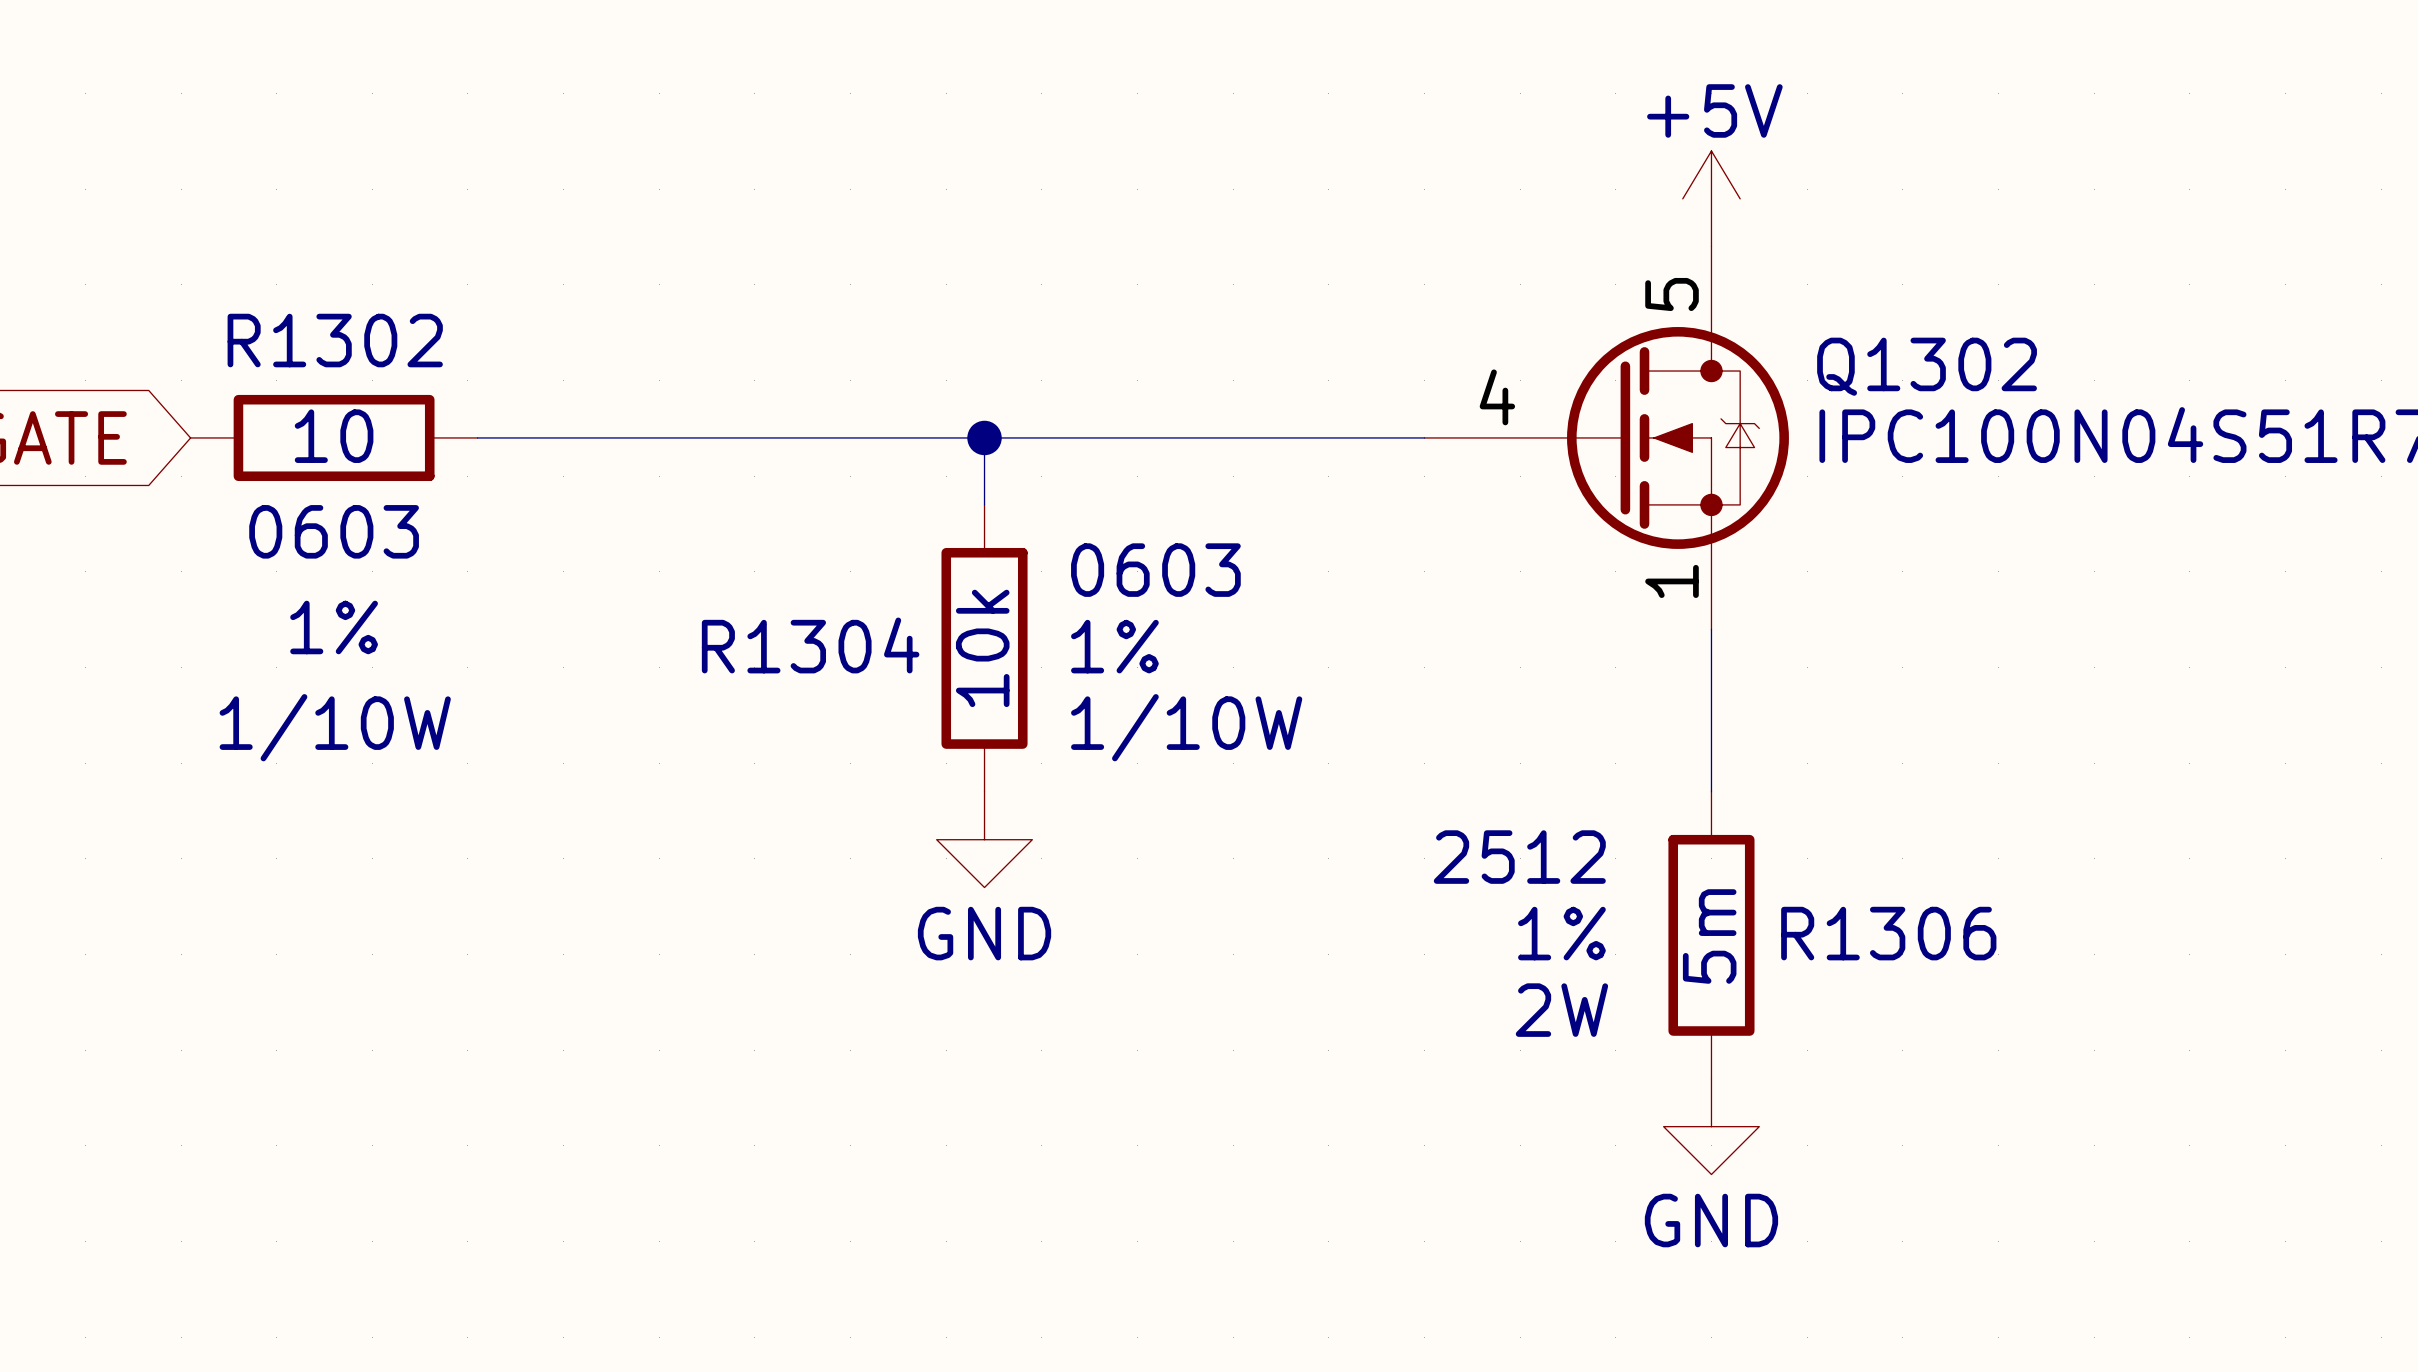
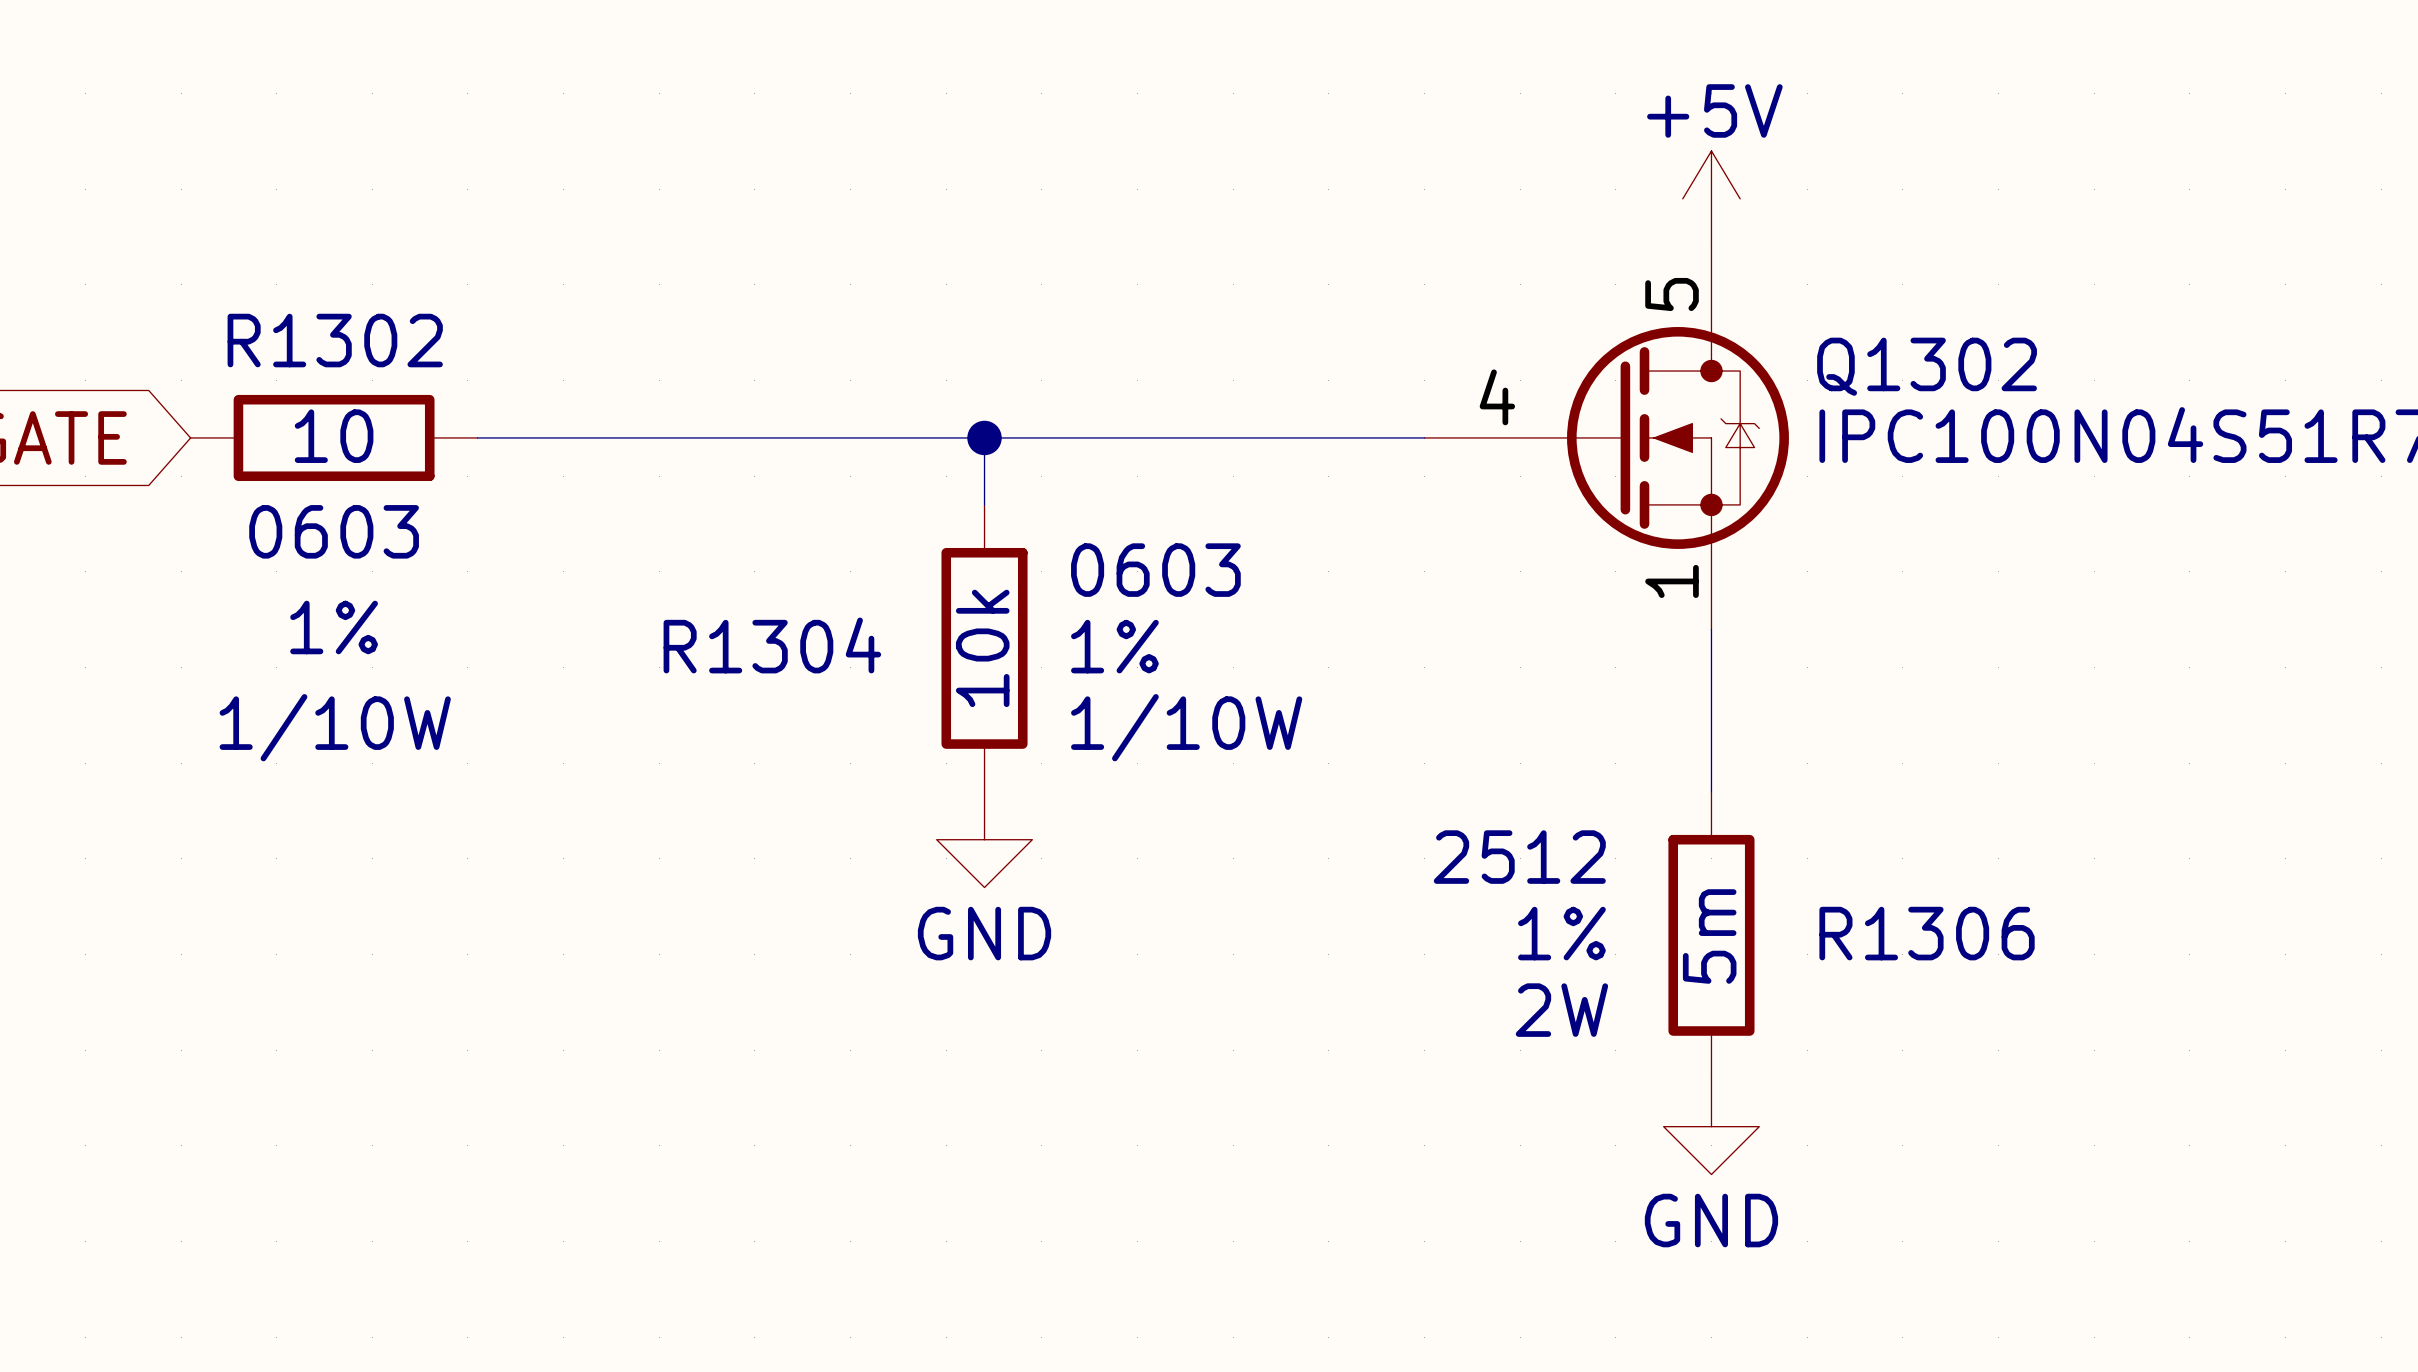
R1304 name position: R1304 (810, 645) -> R1304 (772, 645)
R1306 name position: R1306 (1888, 933) -> R1306 (1927, 933)

